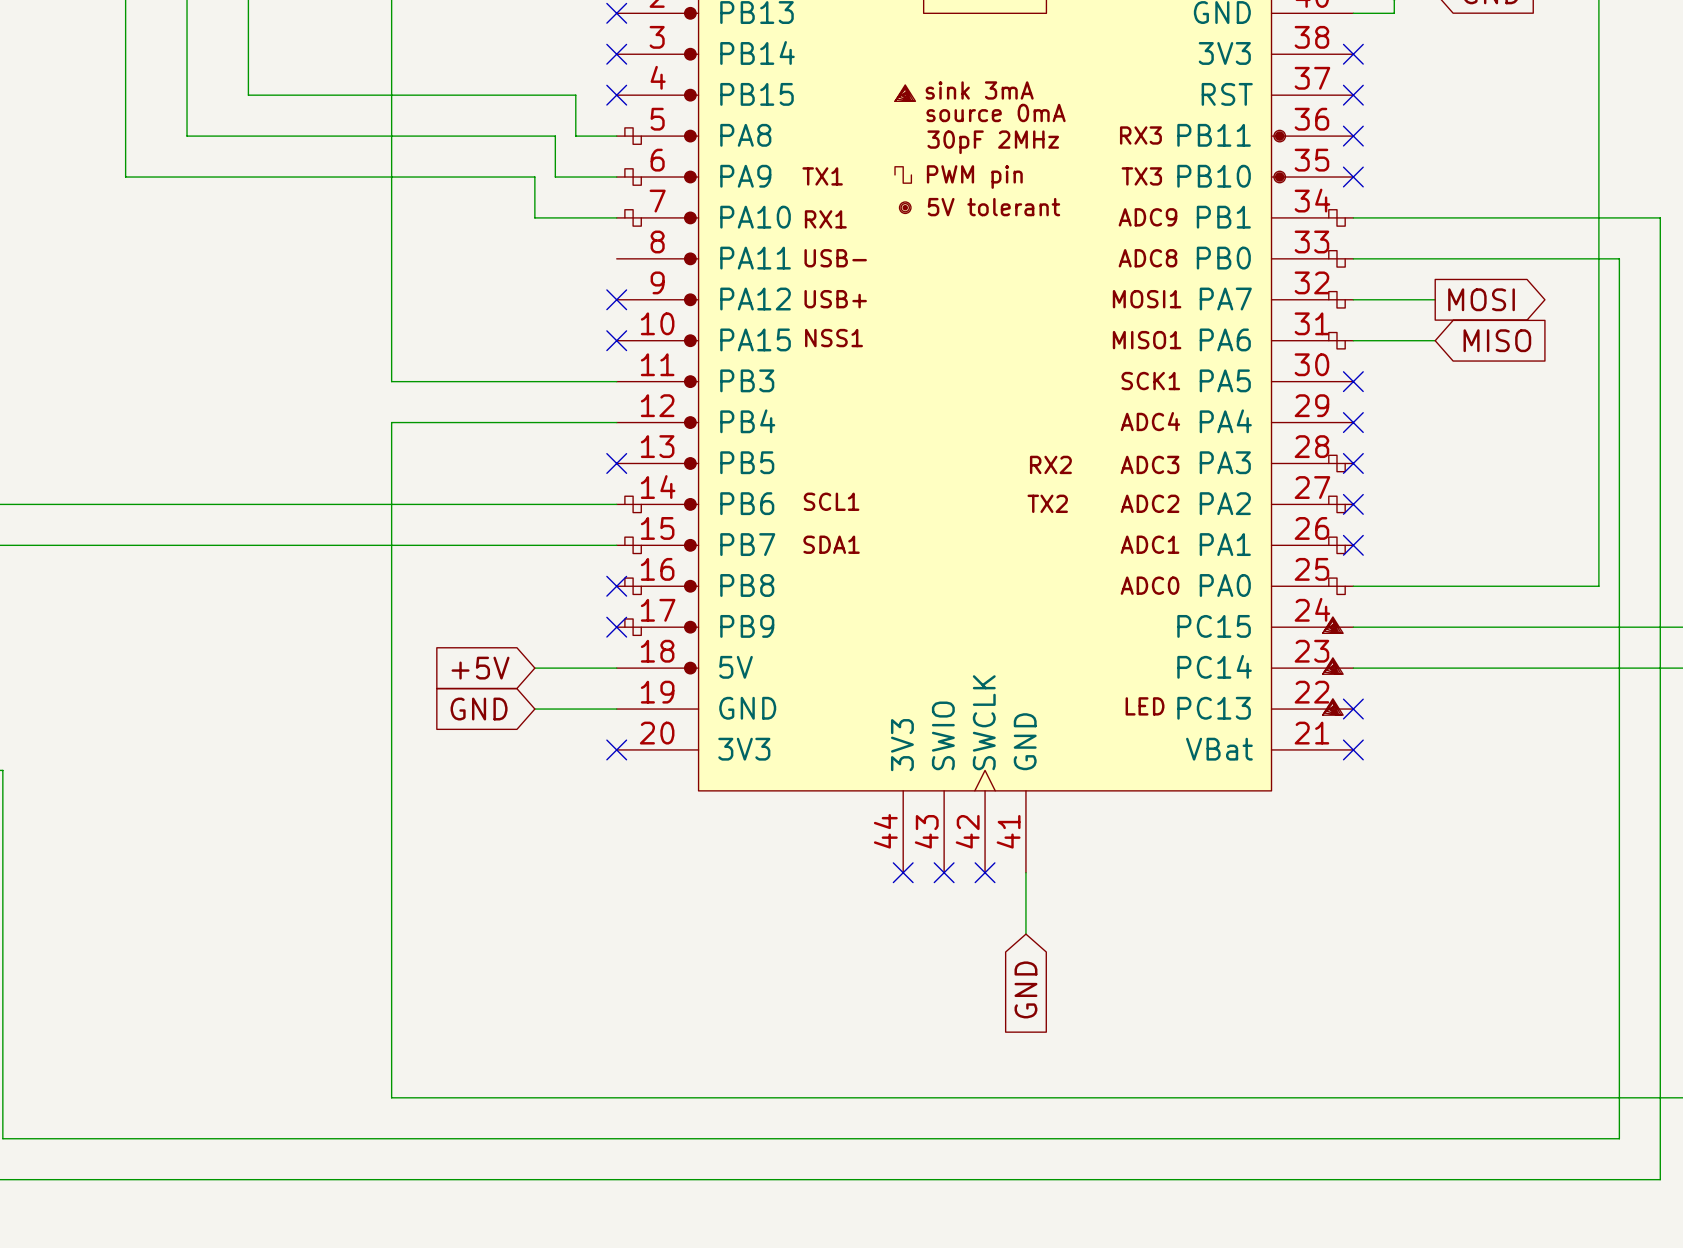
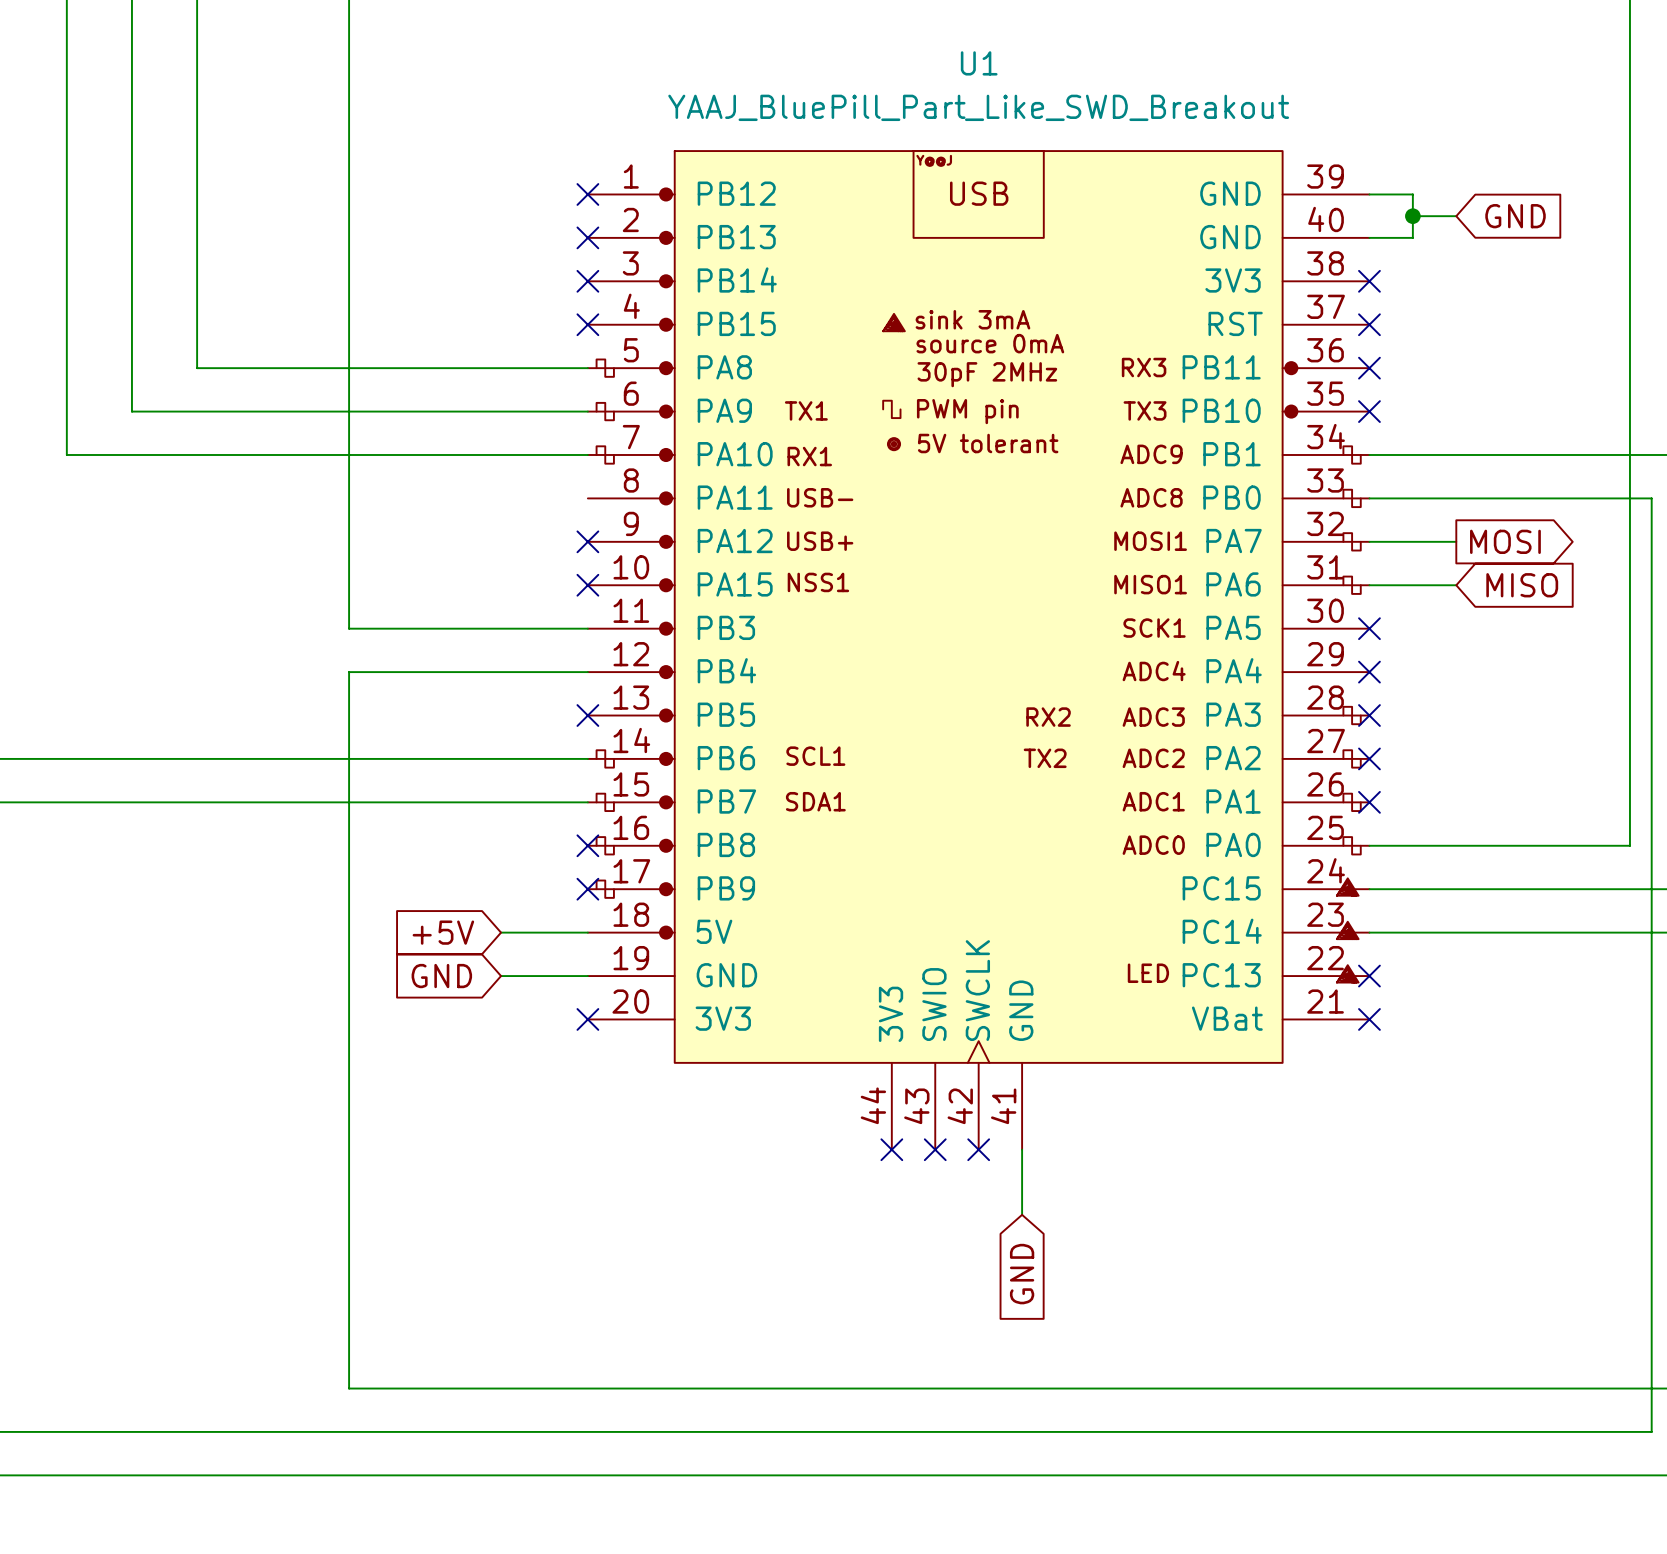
wire: (248, 95) (575, 95) (575, 136) -> none
wire: (187, 136) (248, 136) -> (197, 324) (197, 368)
wire: (555, 136) (555, 177) -> (522, 368) (544, 368)
wire: (125, 177) (187, 177) -> (131, 368) (131, 411)
wire: none -> (66, 411) (66, 454) (501, 454)
wire: (534, 177) (534, 217) -> (501, 411) (522, 411)

